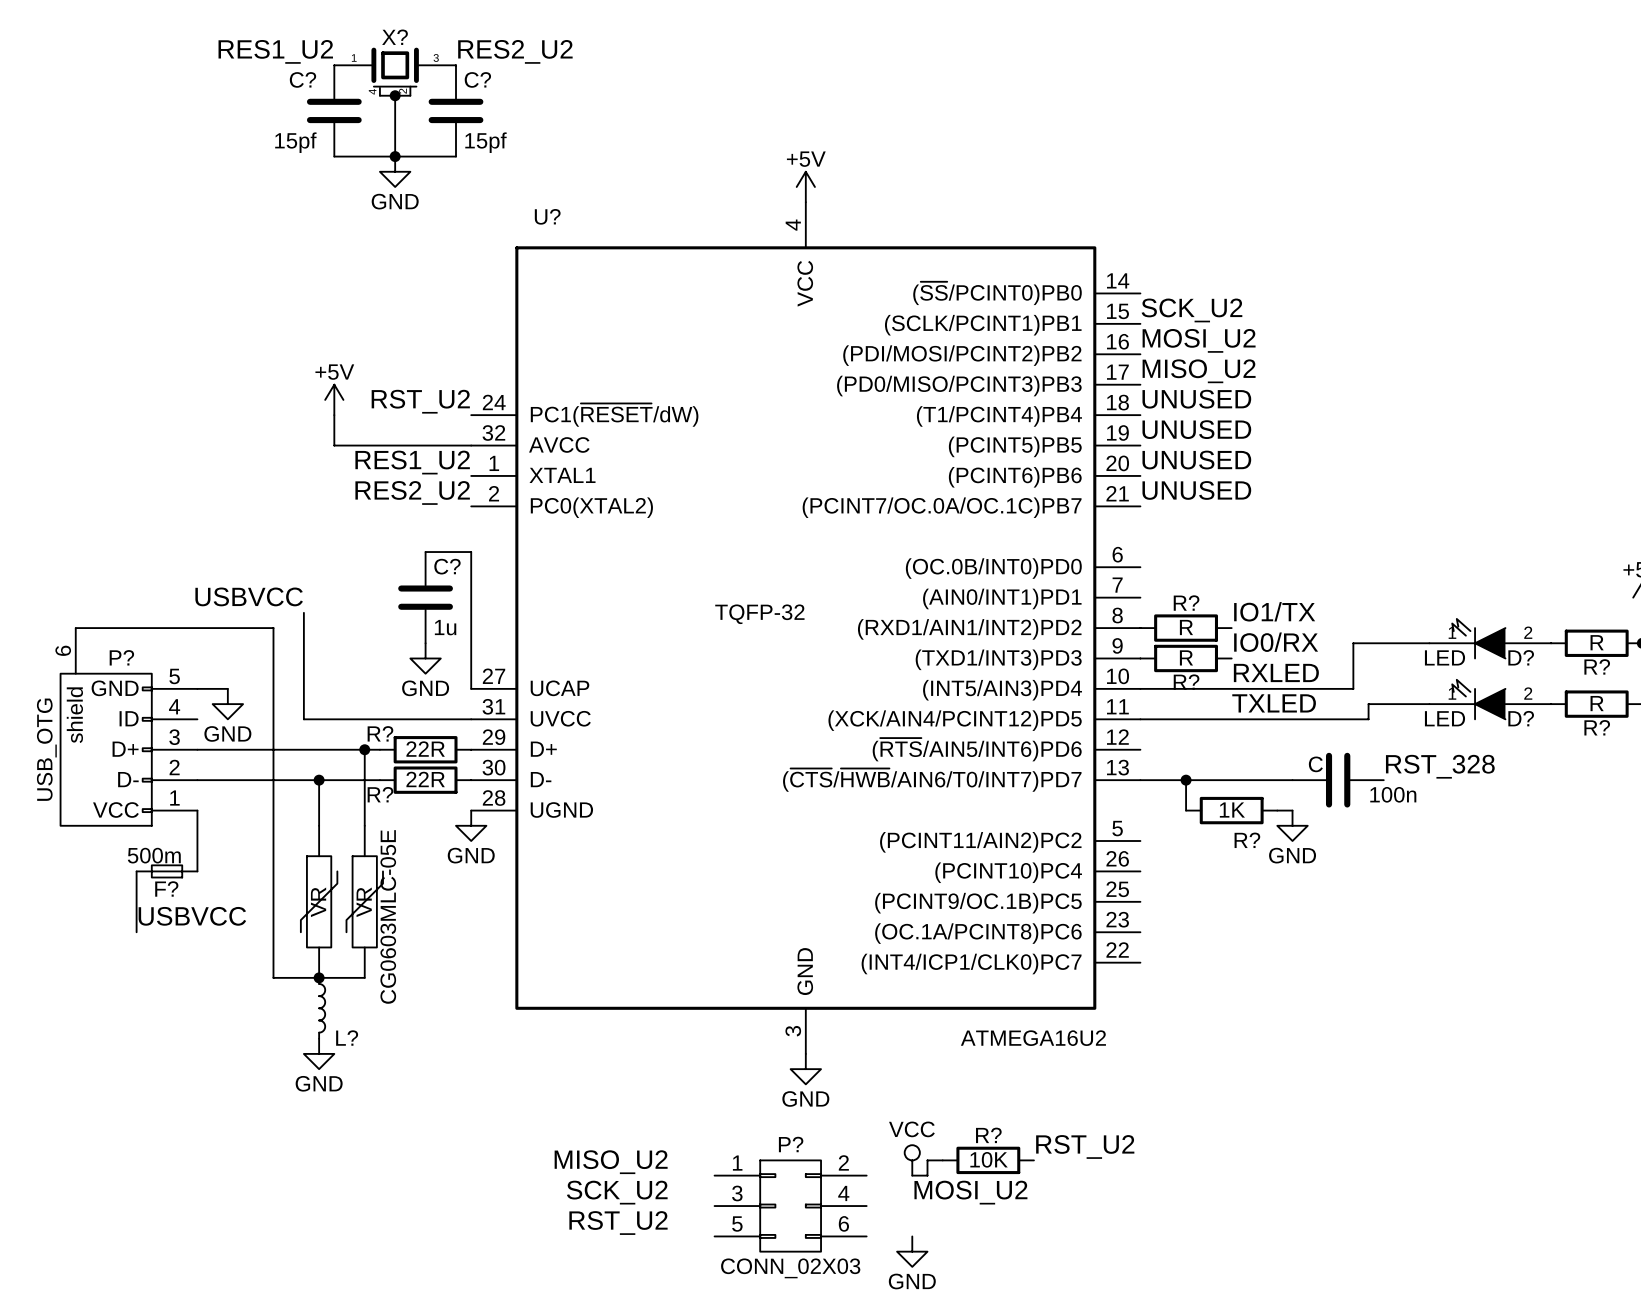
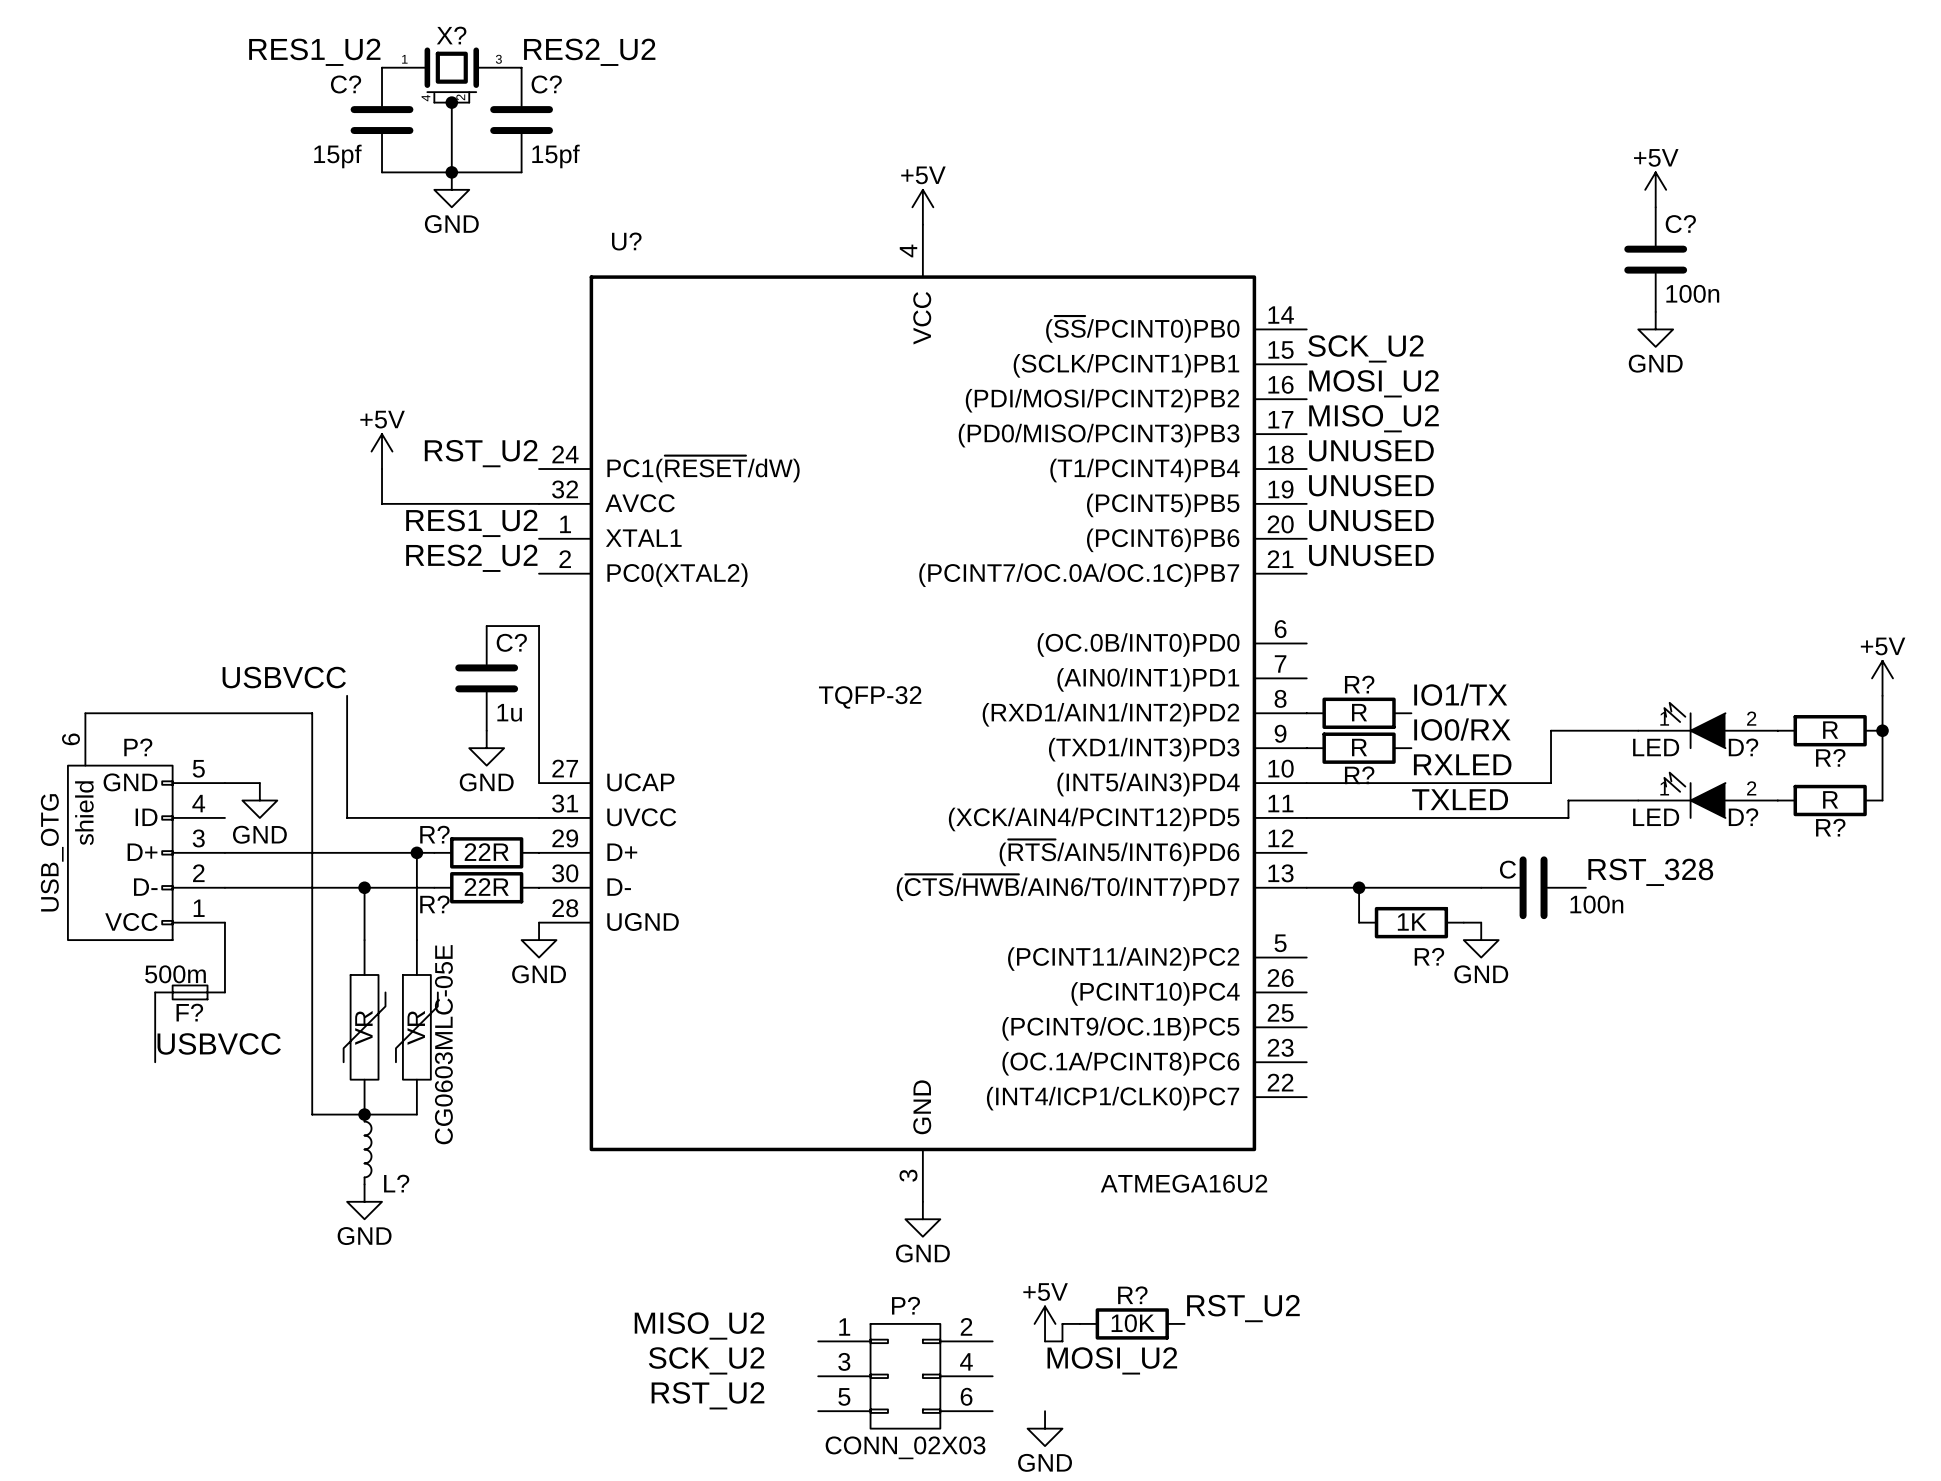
power symbol: none -> +5V (1655, 189)
C?: none -> 100n (1655, 259)
power symbol: none -> GND (1655, 329)
power symbol: VCC (912, 1160) -> +5V (1045, 1323)

